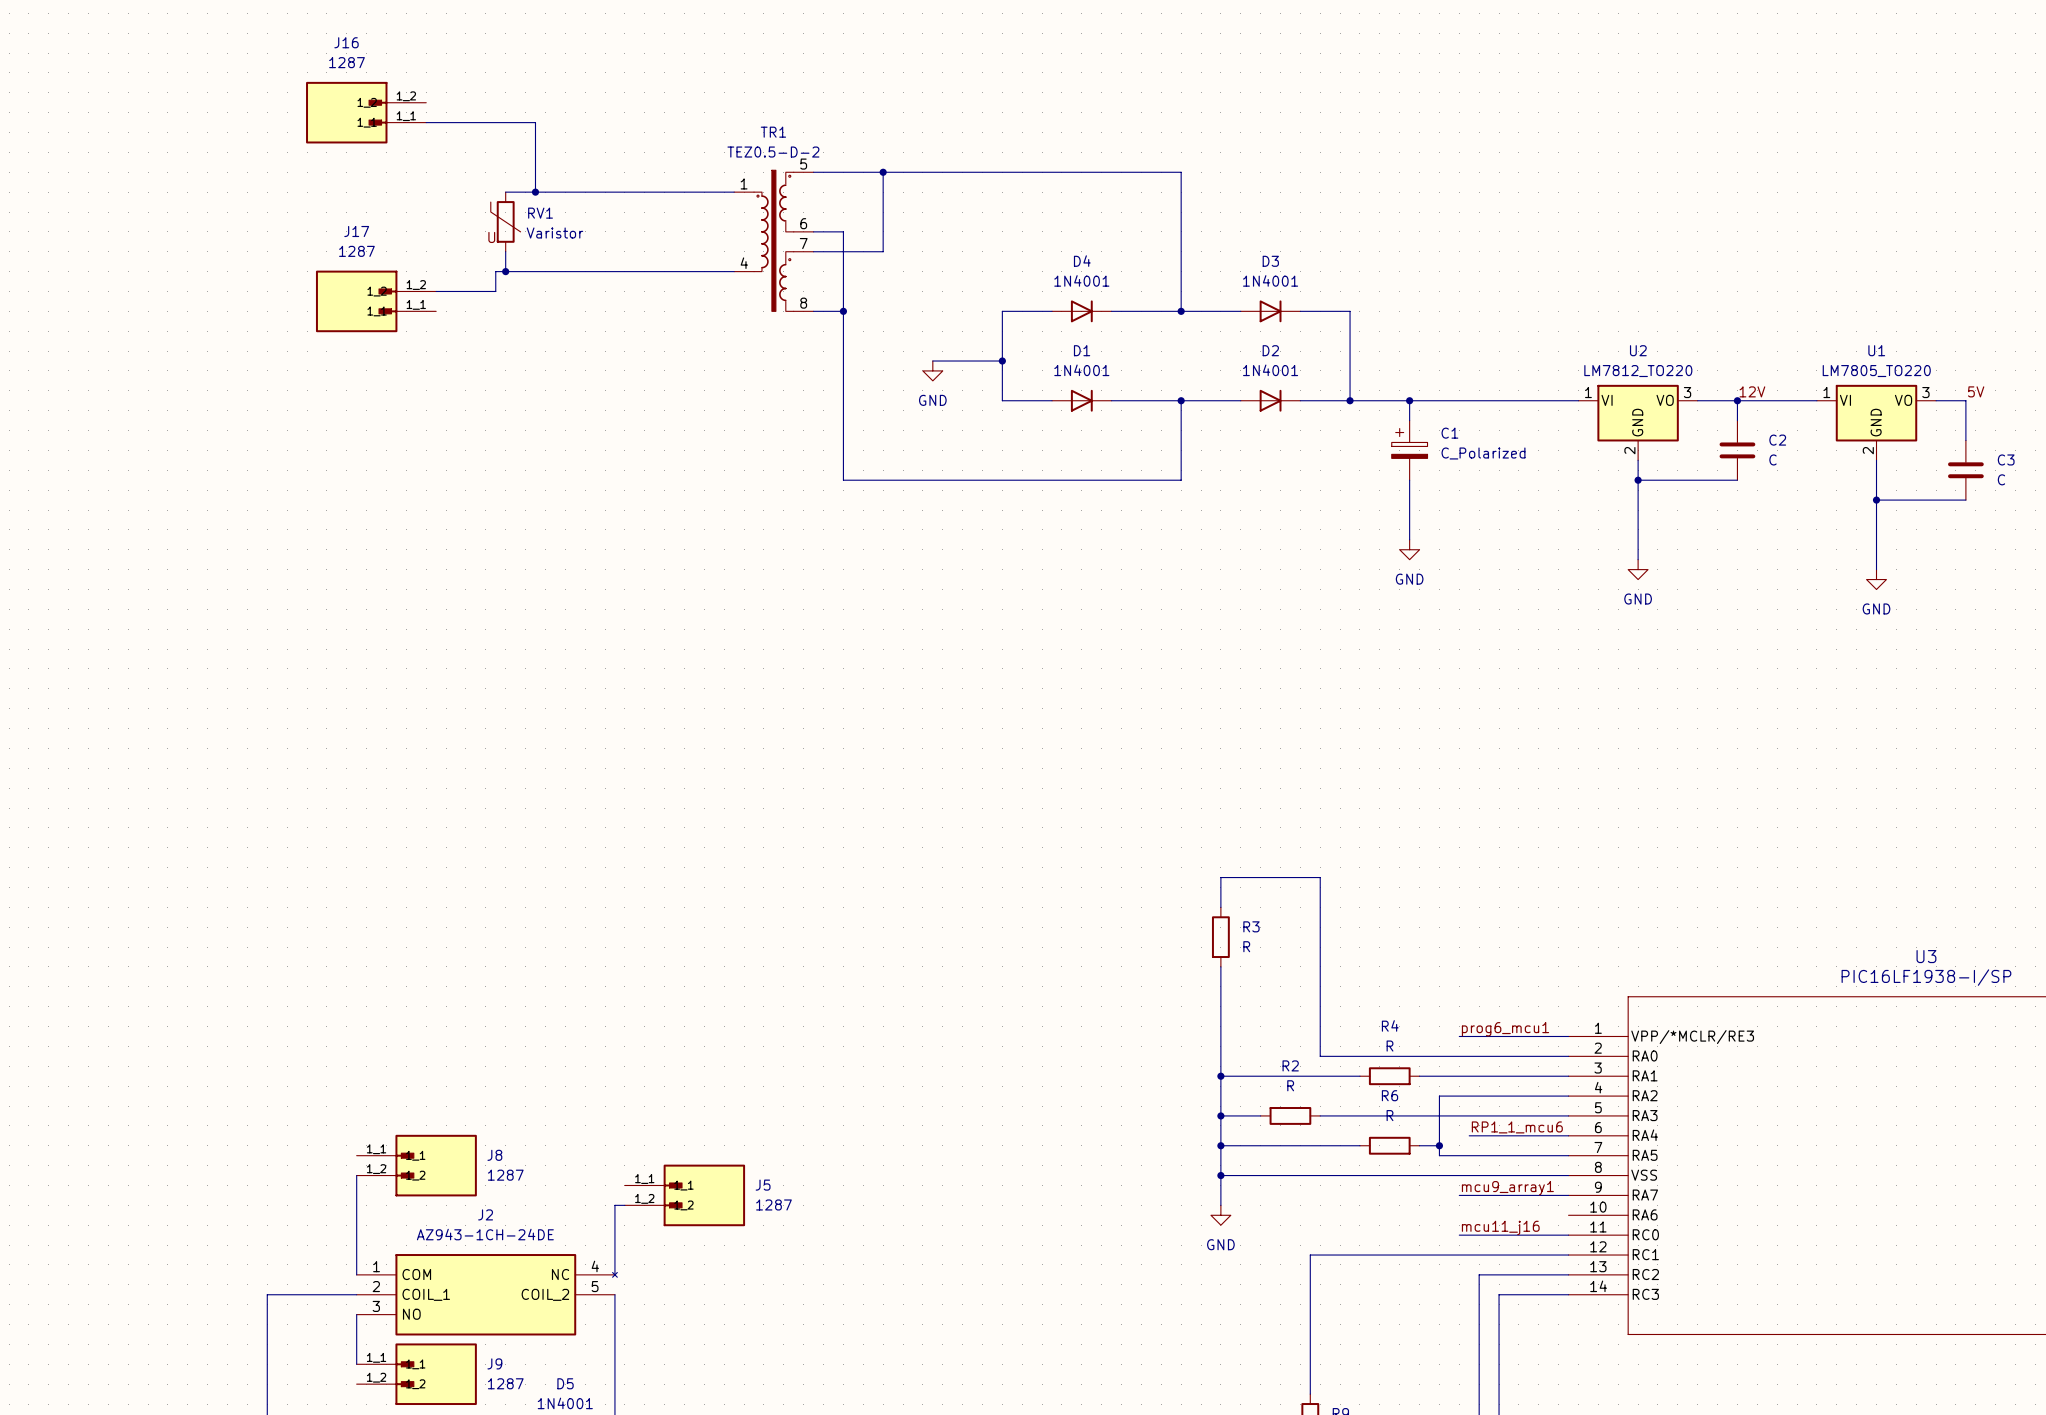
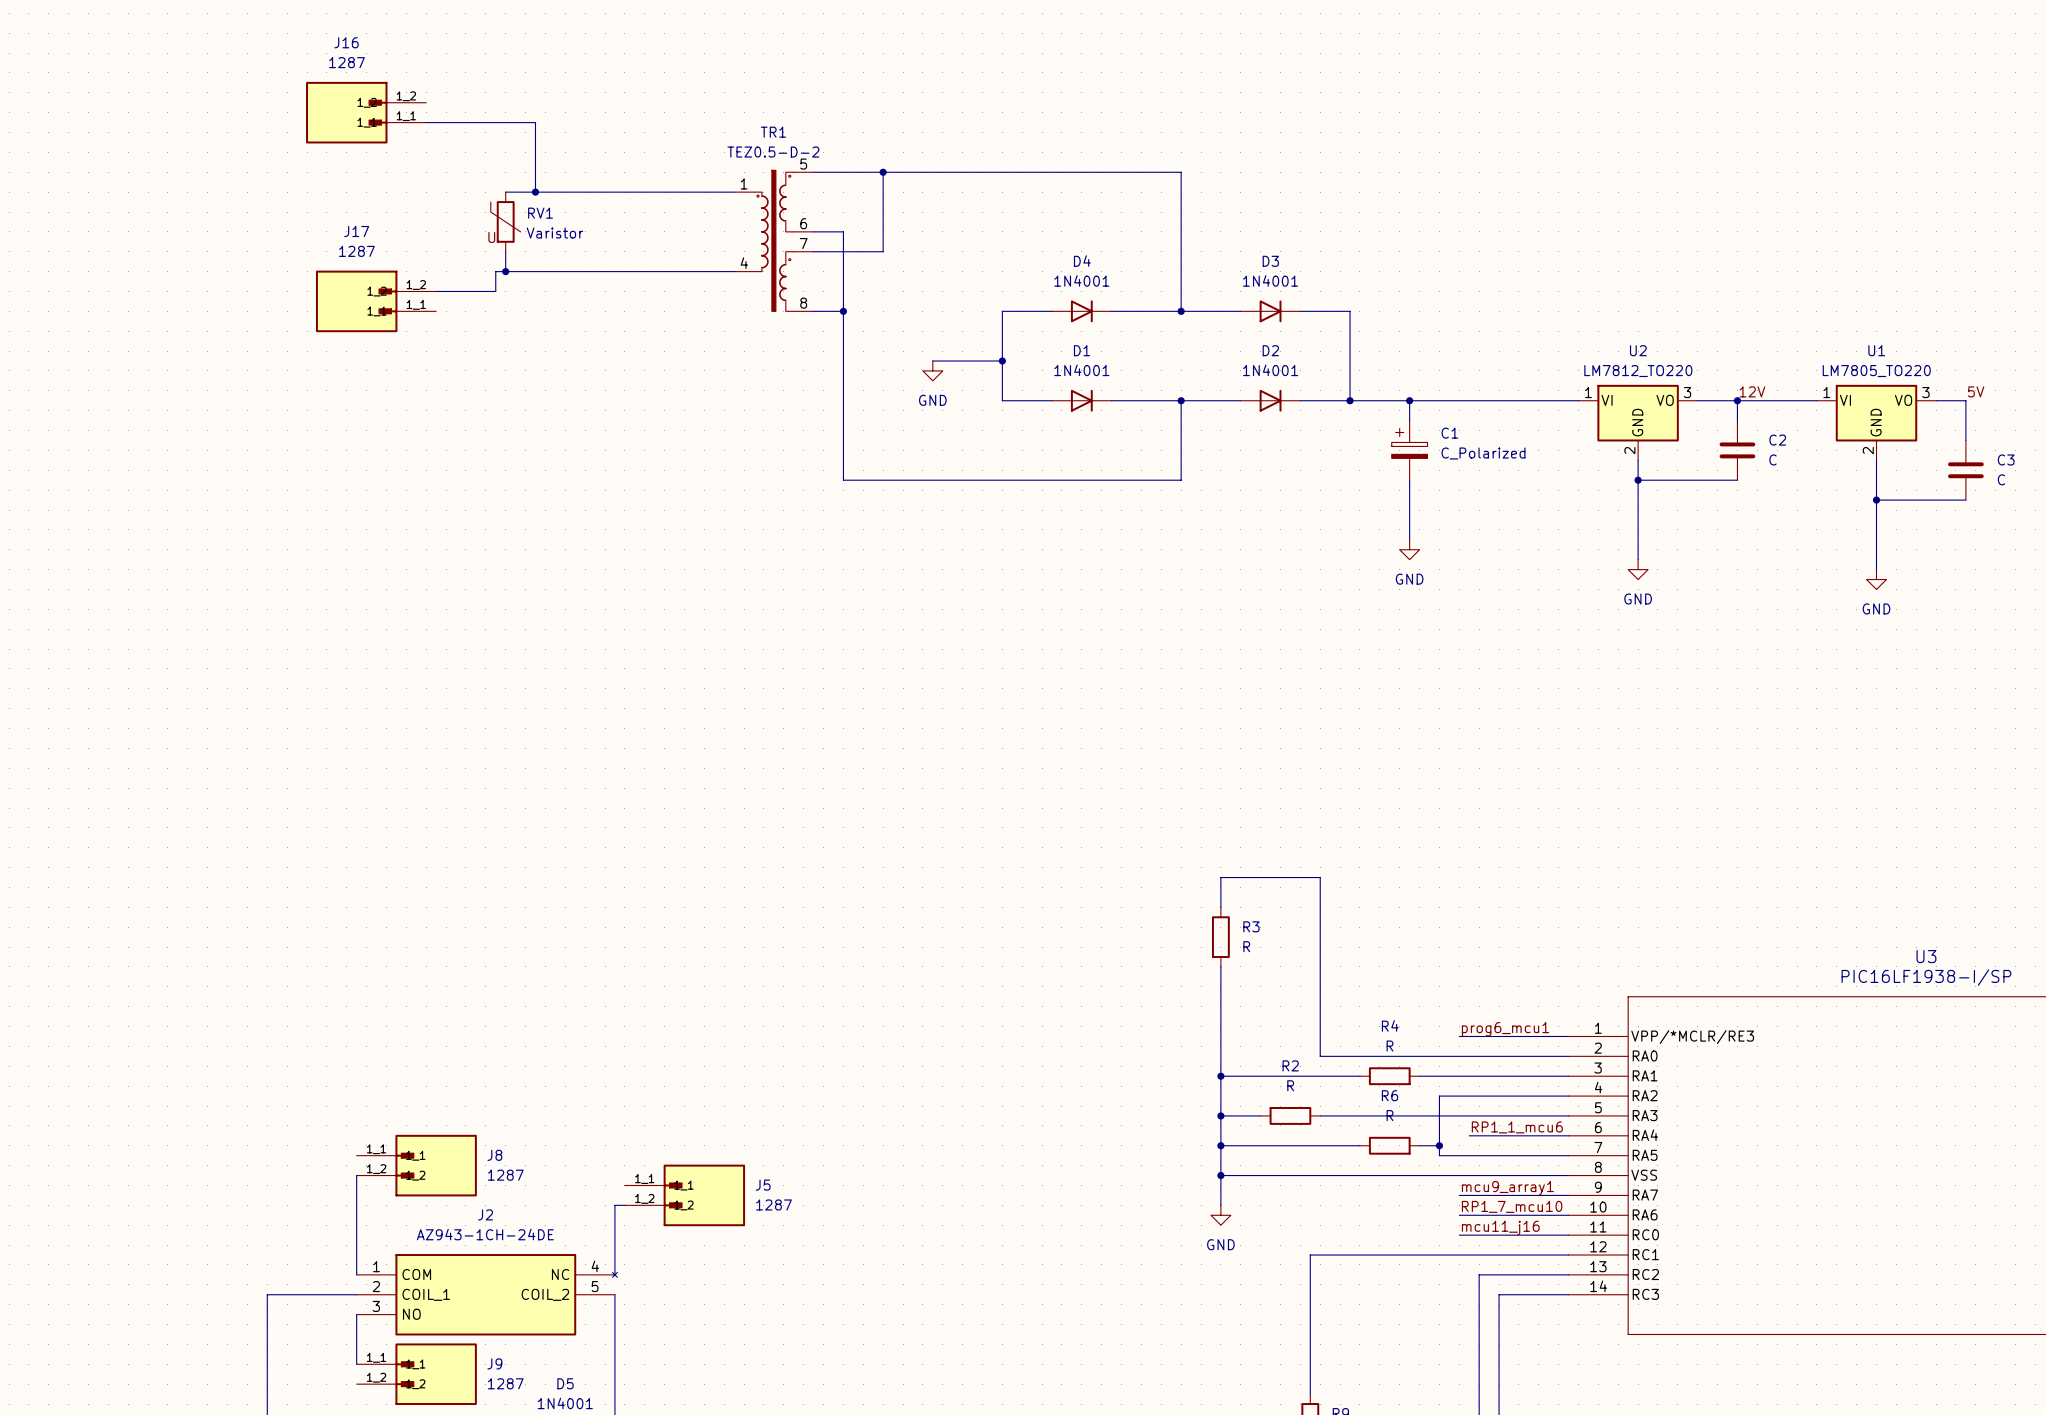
label: none -> RP1_7_mcu10 (1512, 1206)
wire: none -> (1459, 1215) (1568, 1215)

